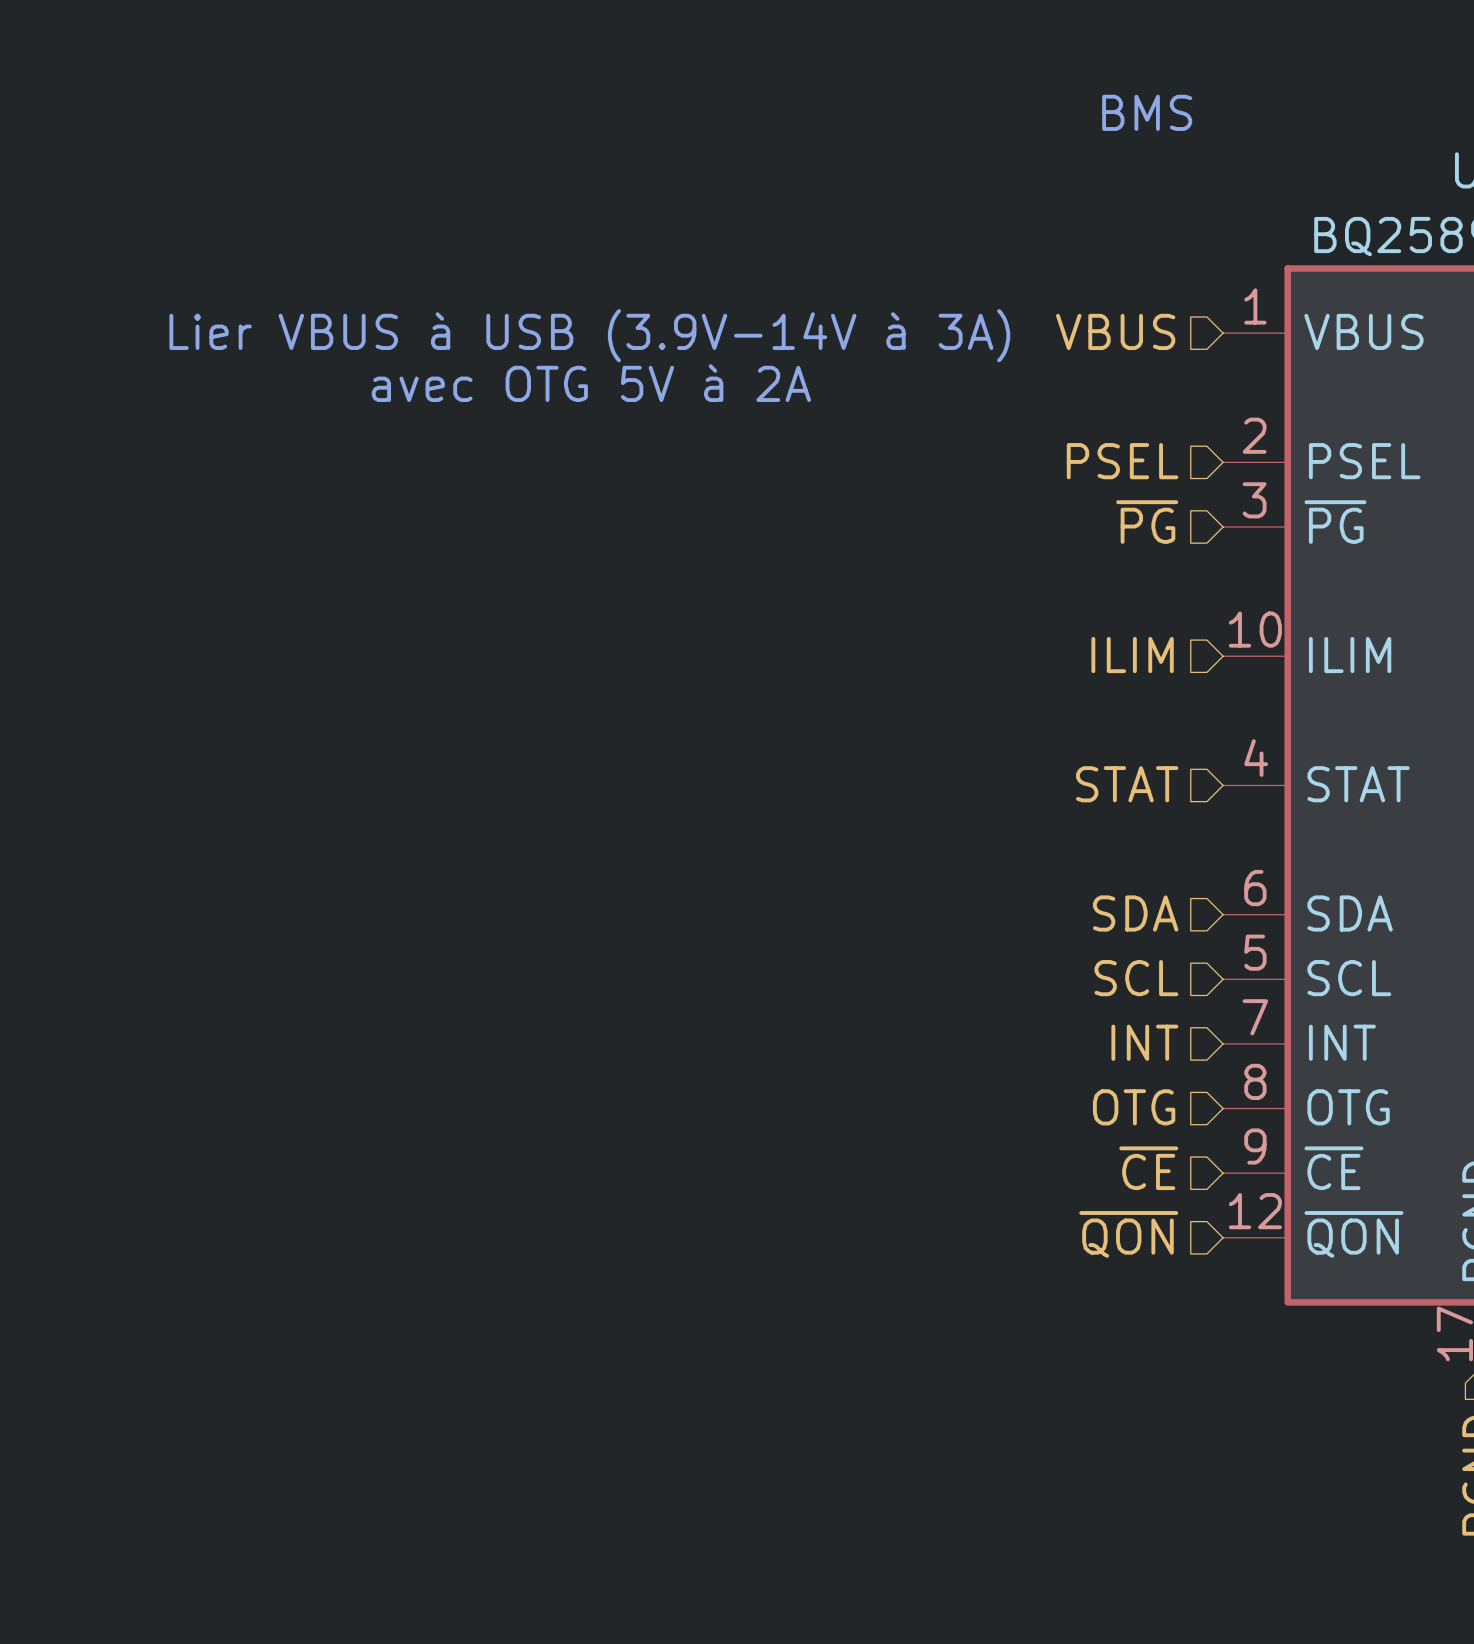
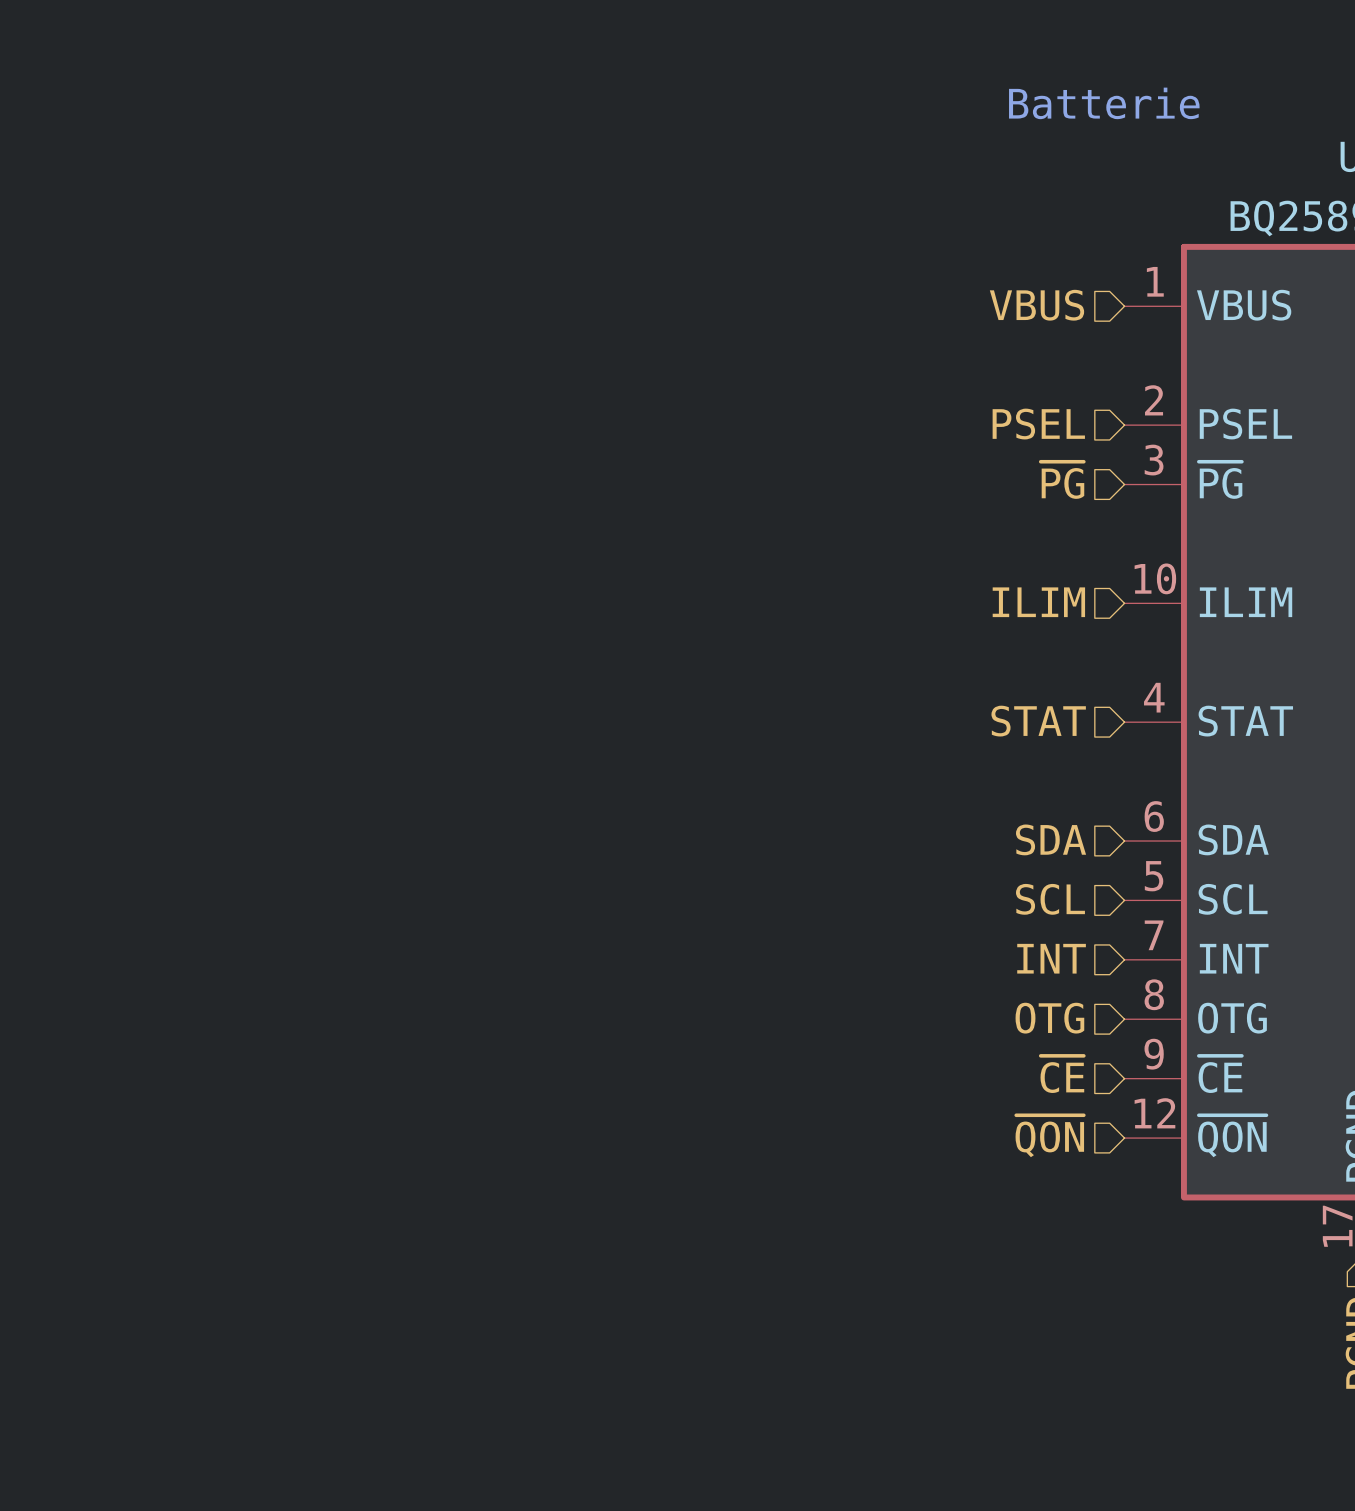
text: BMS (1147, 112) -> Batterie (1104, 103)
text: Lier VBUS à USB (3.9V-14V à 3A) (589, 335) -> none
text: avec OTG 5V à 2A (591, 383) -> none

